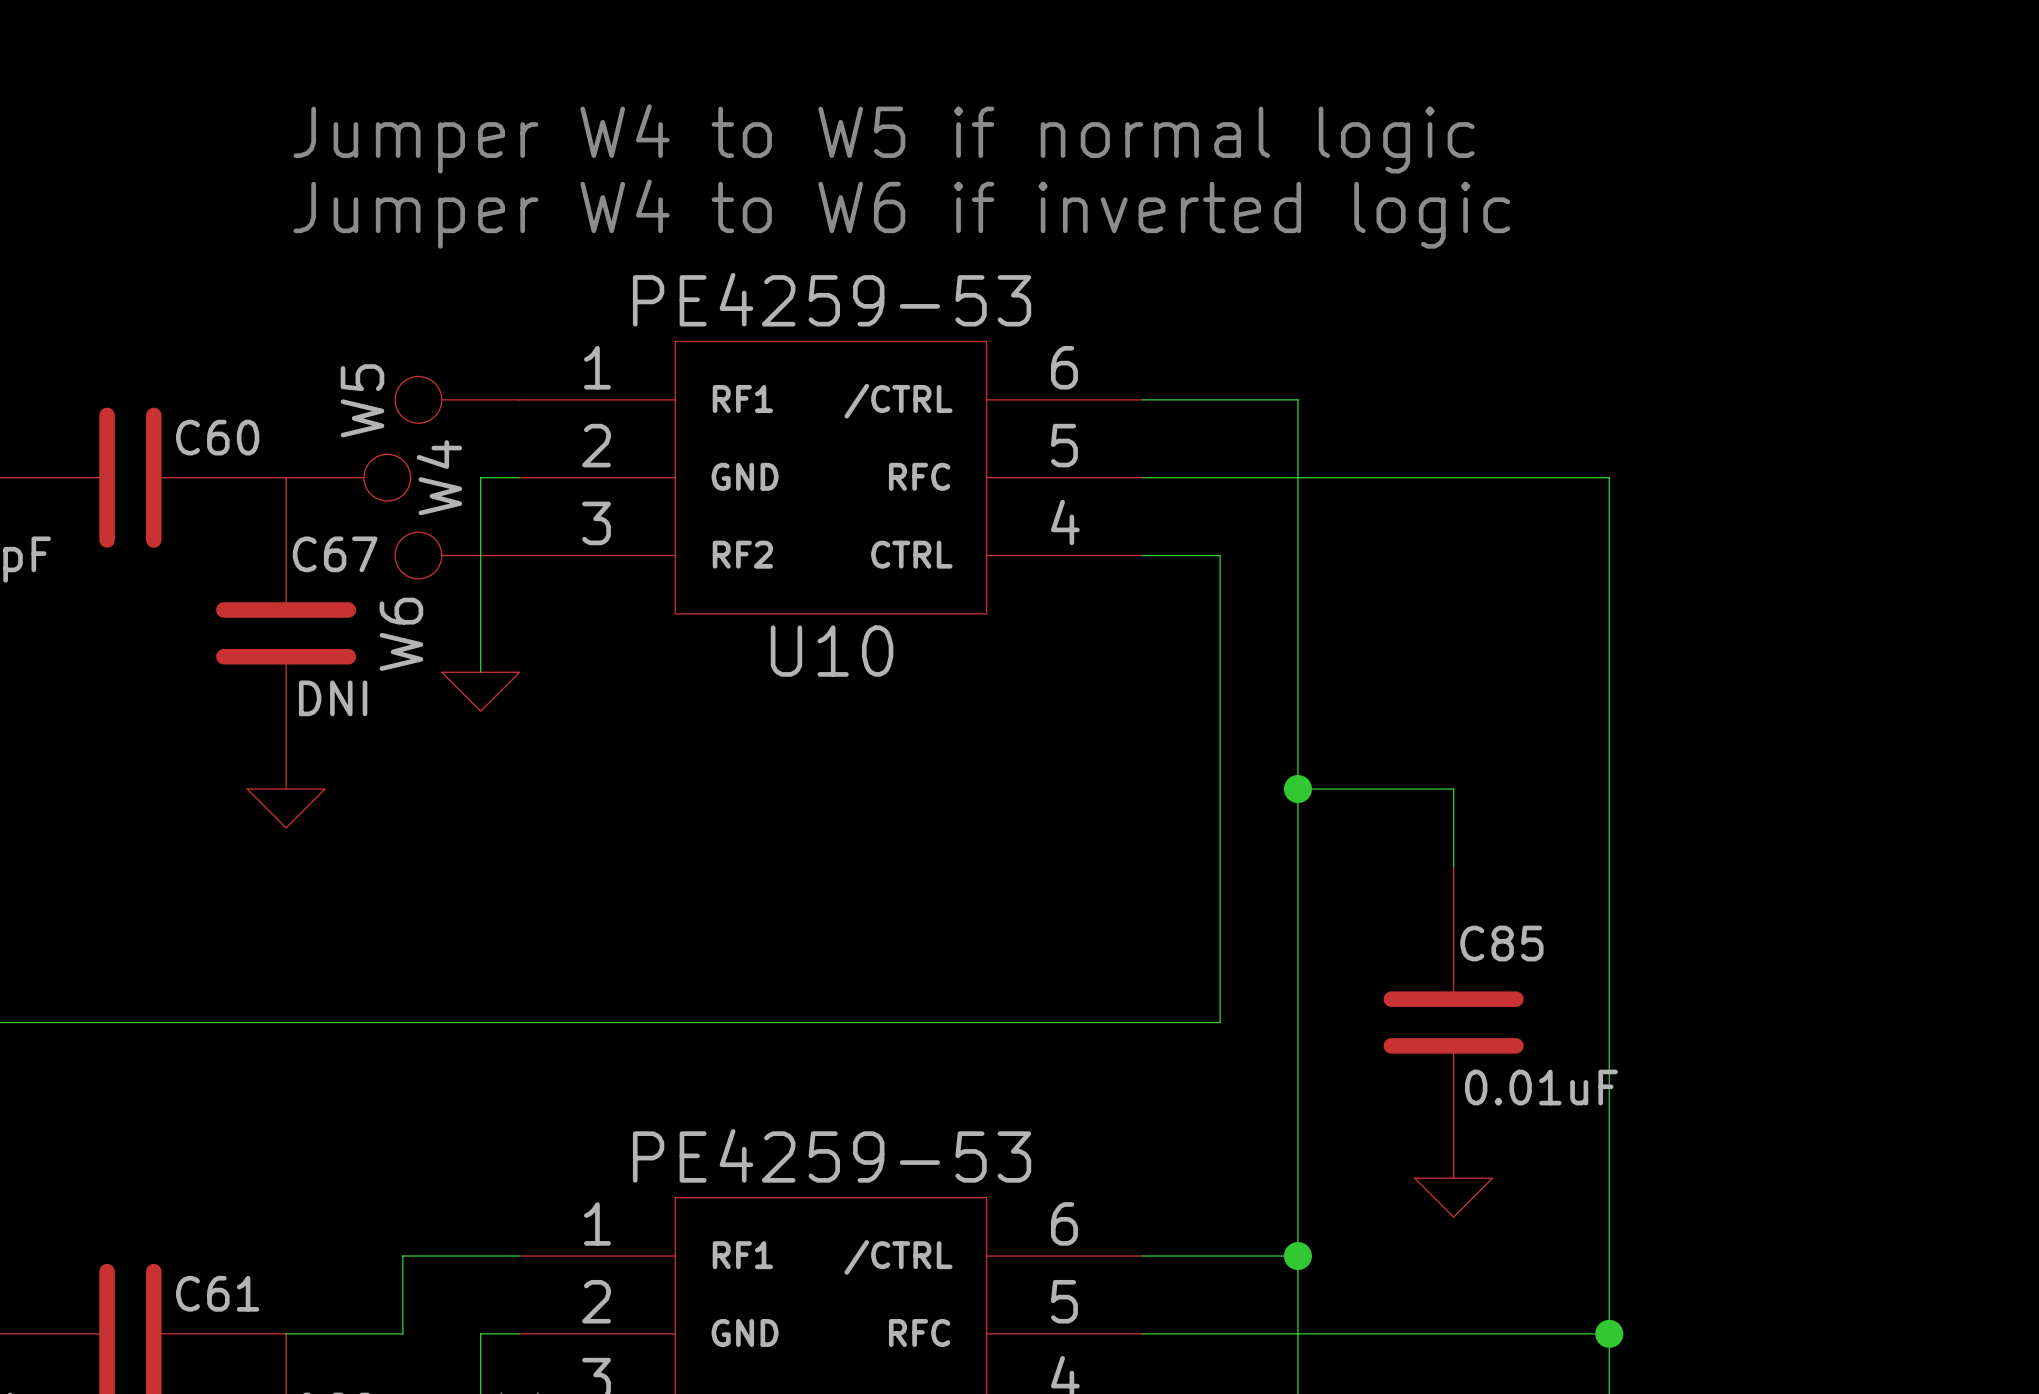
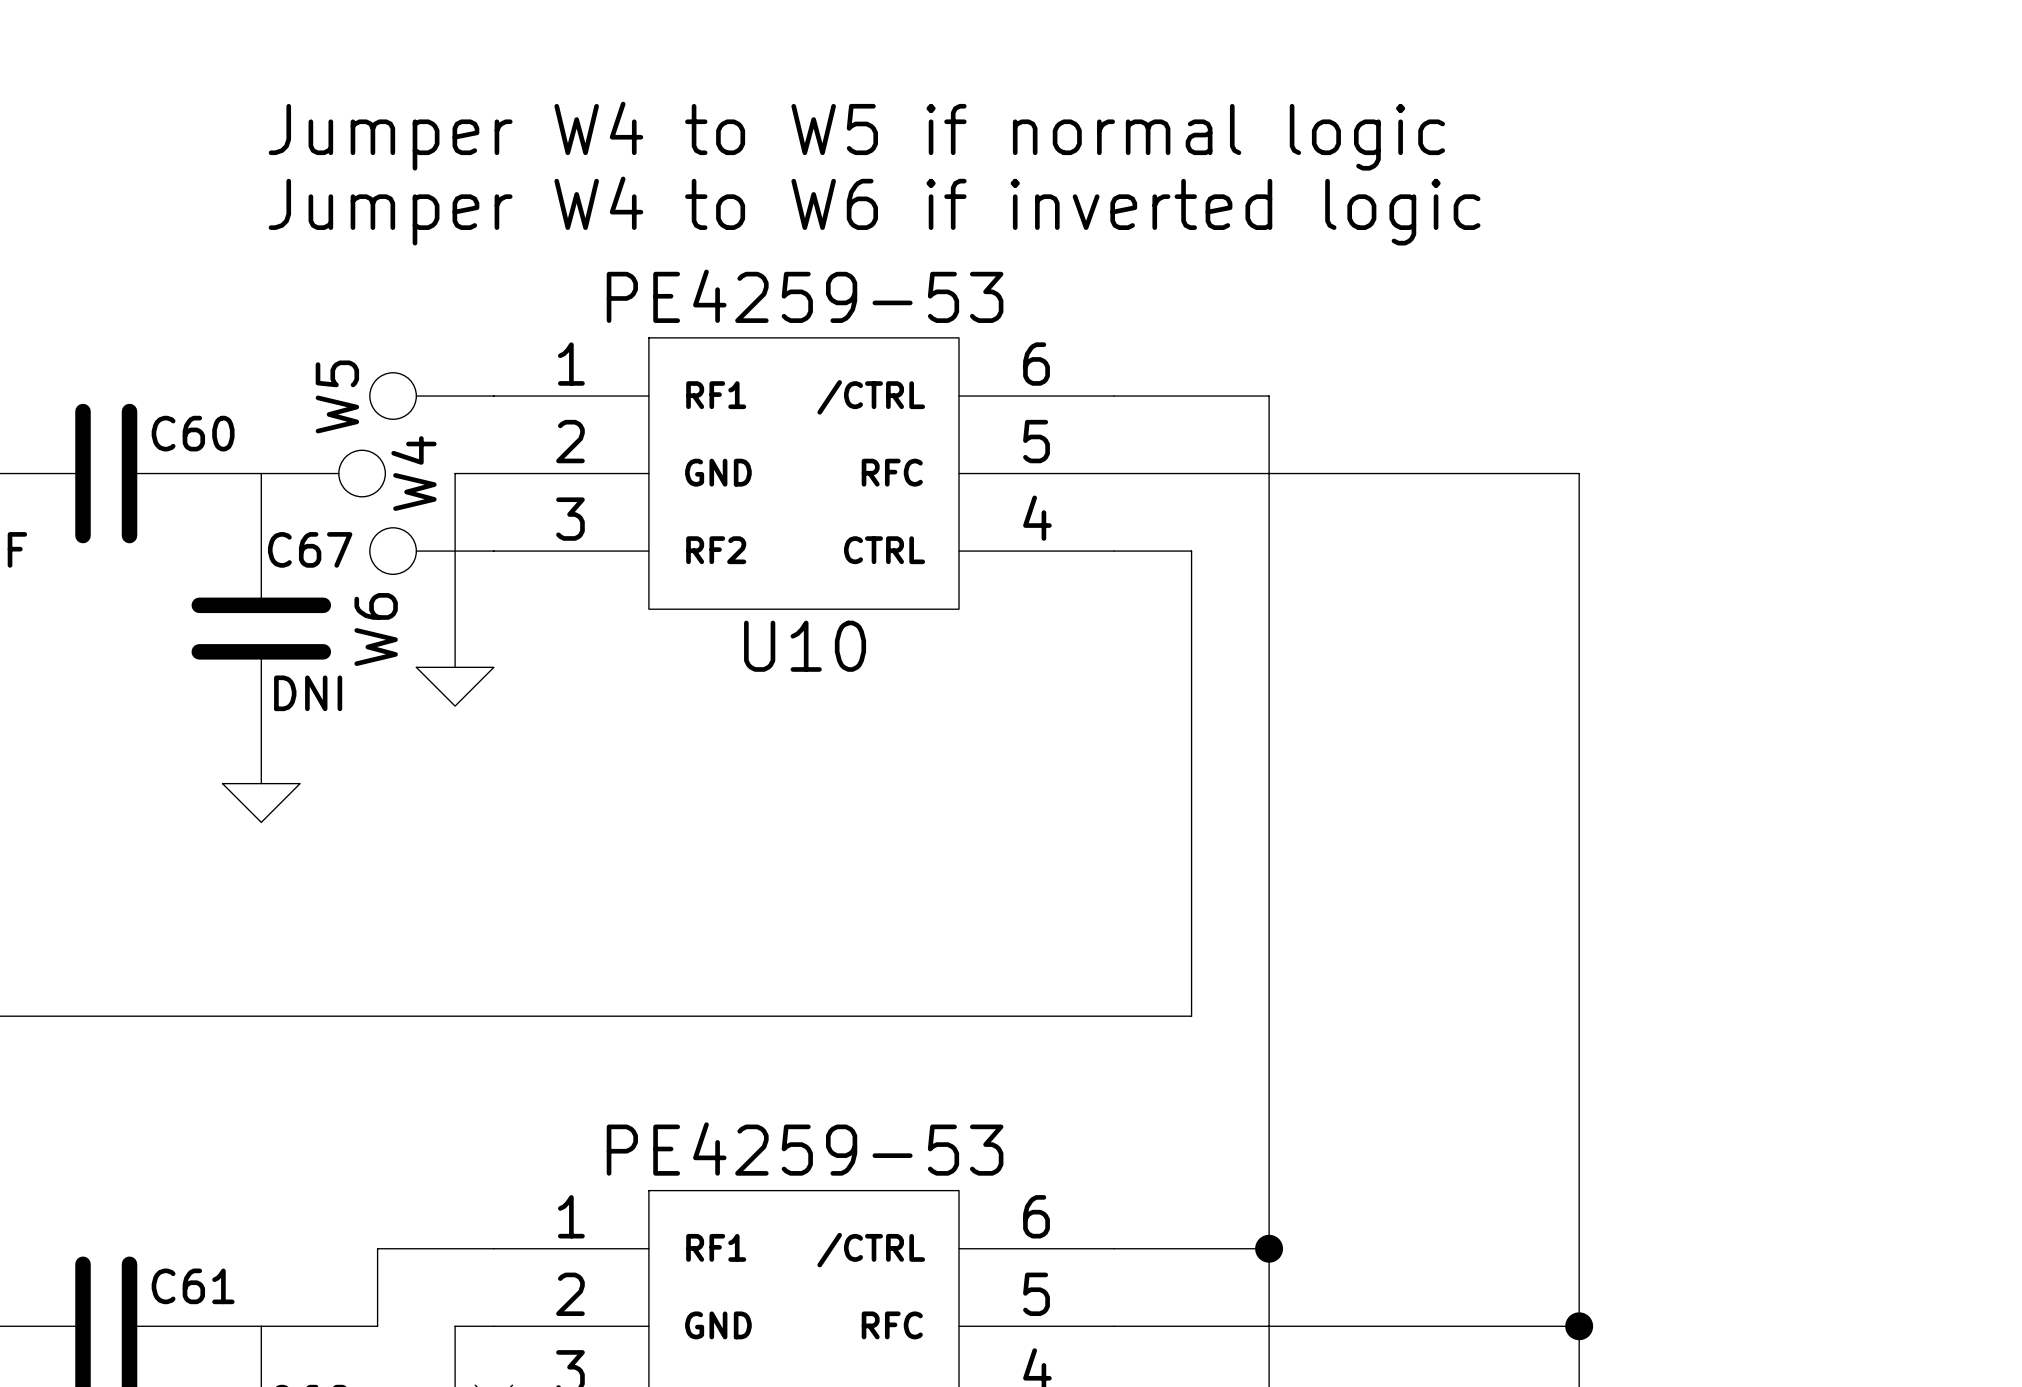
wire: (1297, 789) (1453, 789) (1453, 866) -> none
junction: (1297, 789) -> none
C85: 0.01uF (1453, 1022) -> none
power symbol: (1453, 1197) -> none

